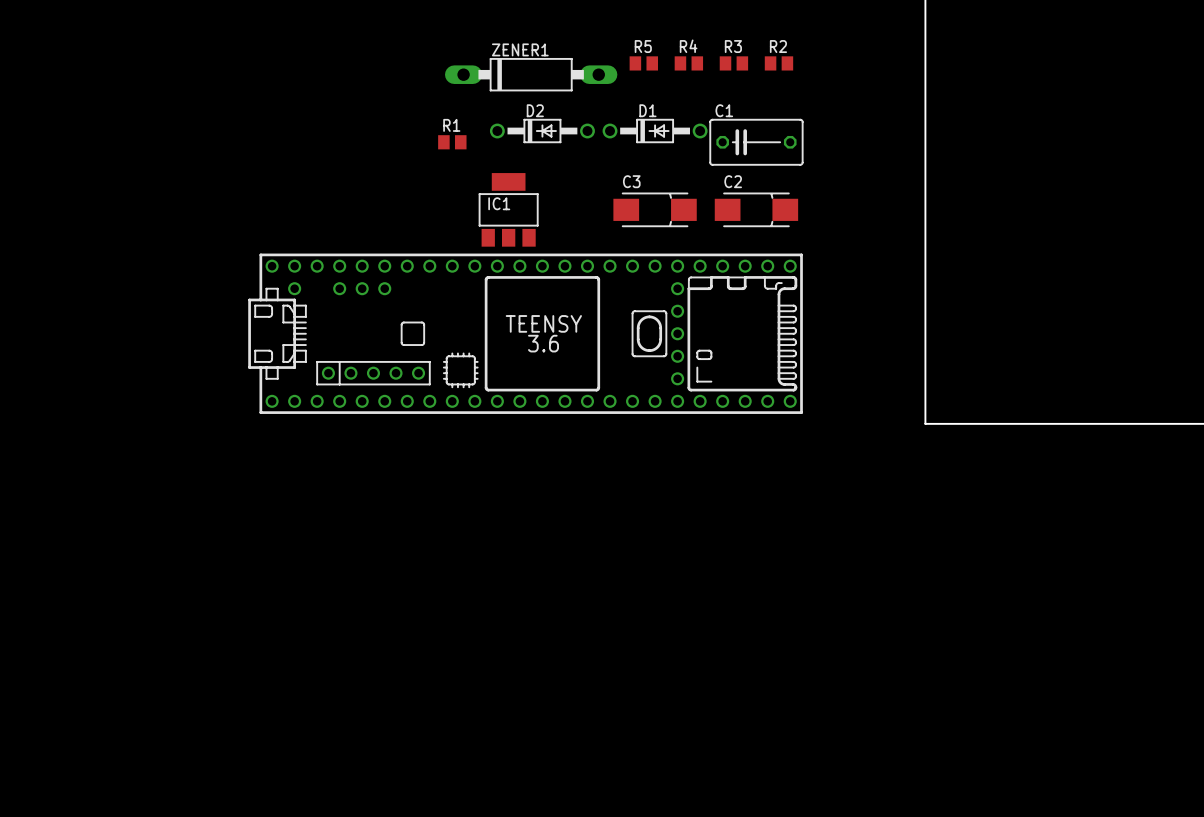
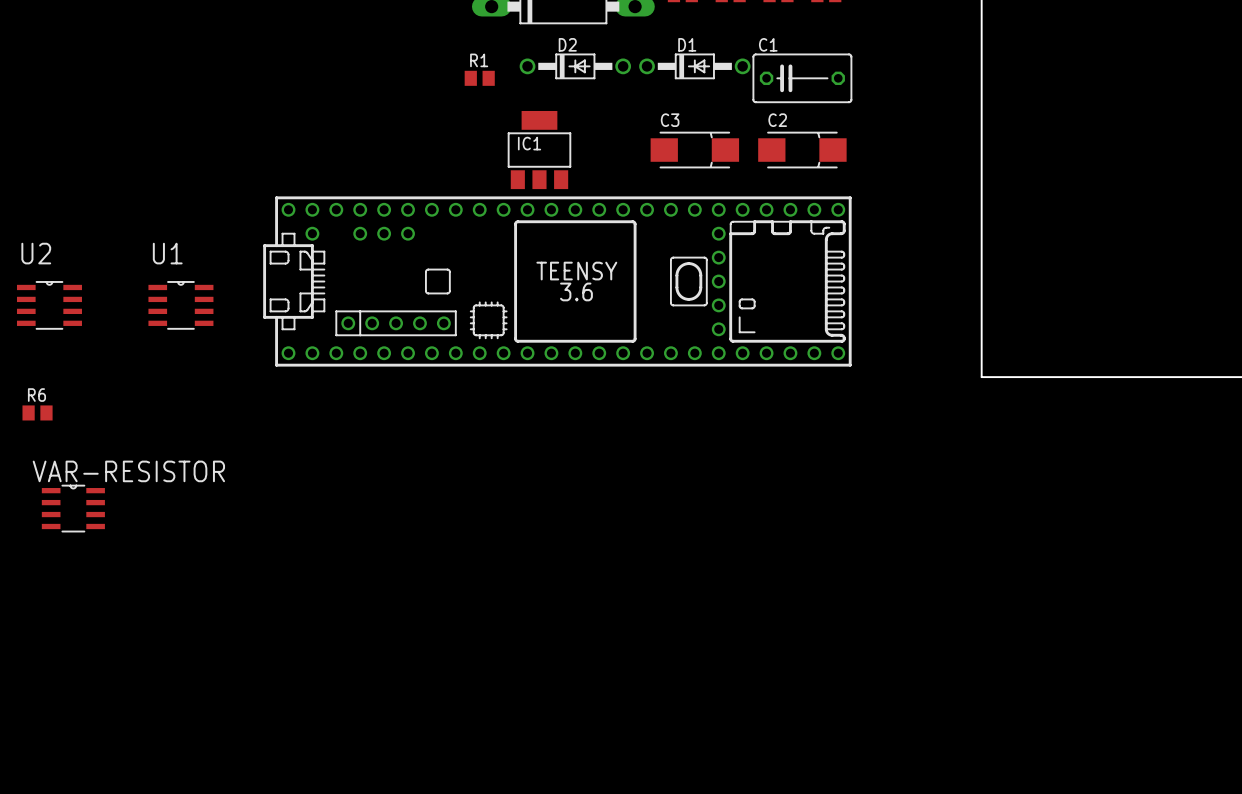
U2: none -> (49, 305)
U1: none -> (180, 305)
R6: none -> (37, 412)
VAR-RESISTOR: none -> (73, 508)

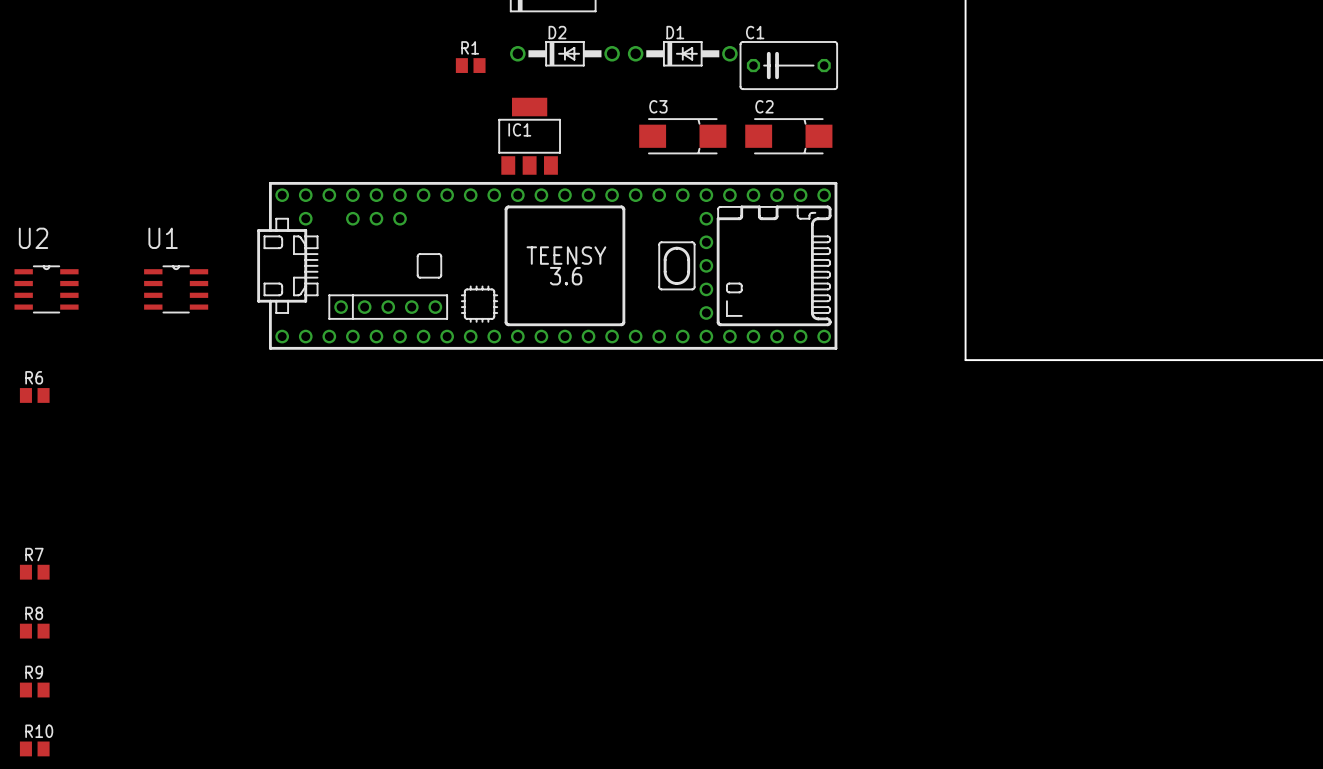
VAR-RESISTOR: (73, 508) -> none
R7: none -> (34, 572)
R8: none -> (34, 631)
R9: none -> (34, 690)
R10: none -> (34, 748)

